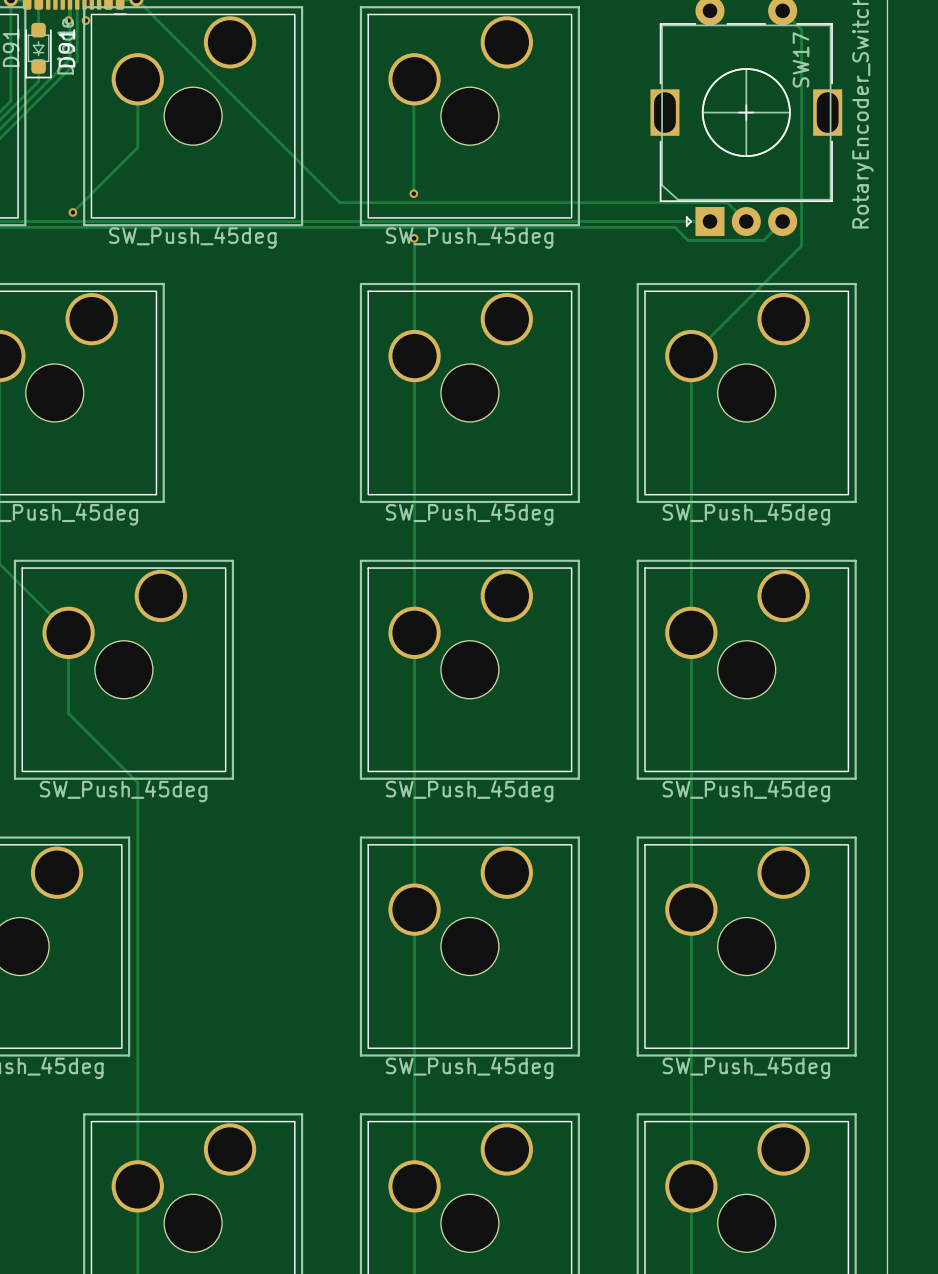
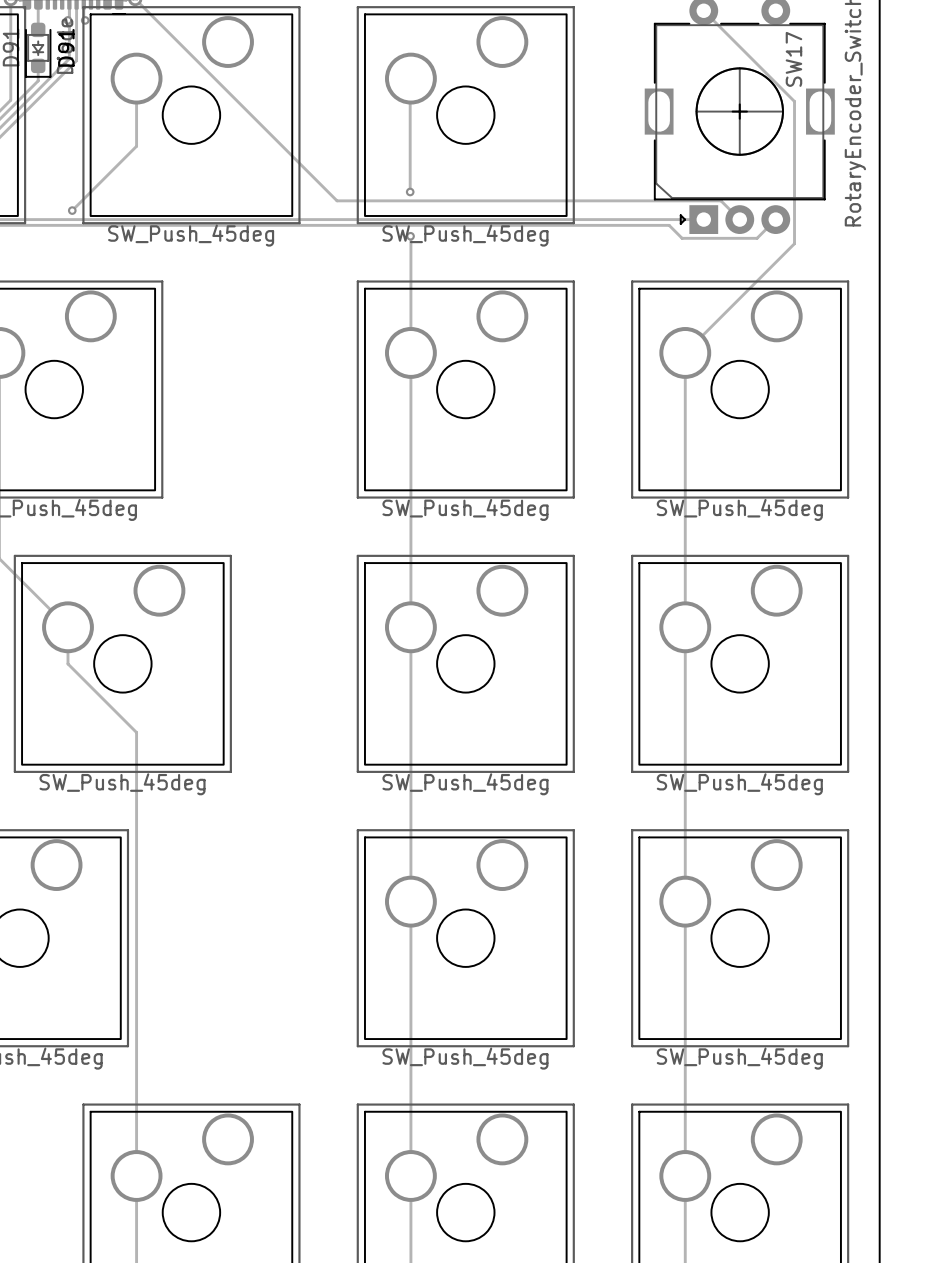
track: (782, 10) (801, 29) (801, 102) -> (703, 10) (794, 101)
track: (68, 669) (68, 713) (137, 782) -> (67, 663) (136, 732) (136, 775)

